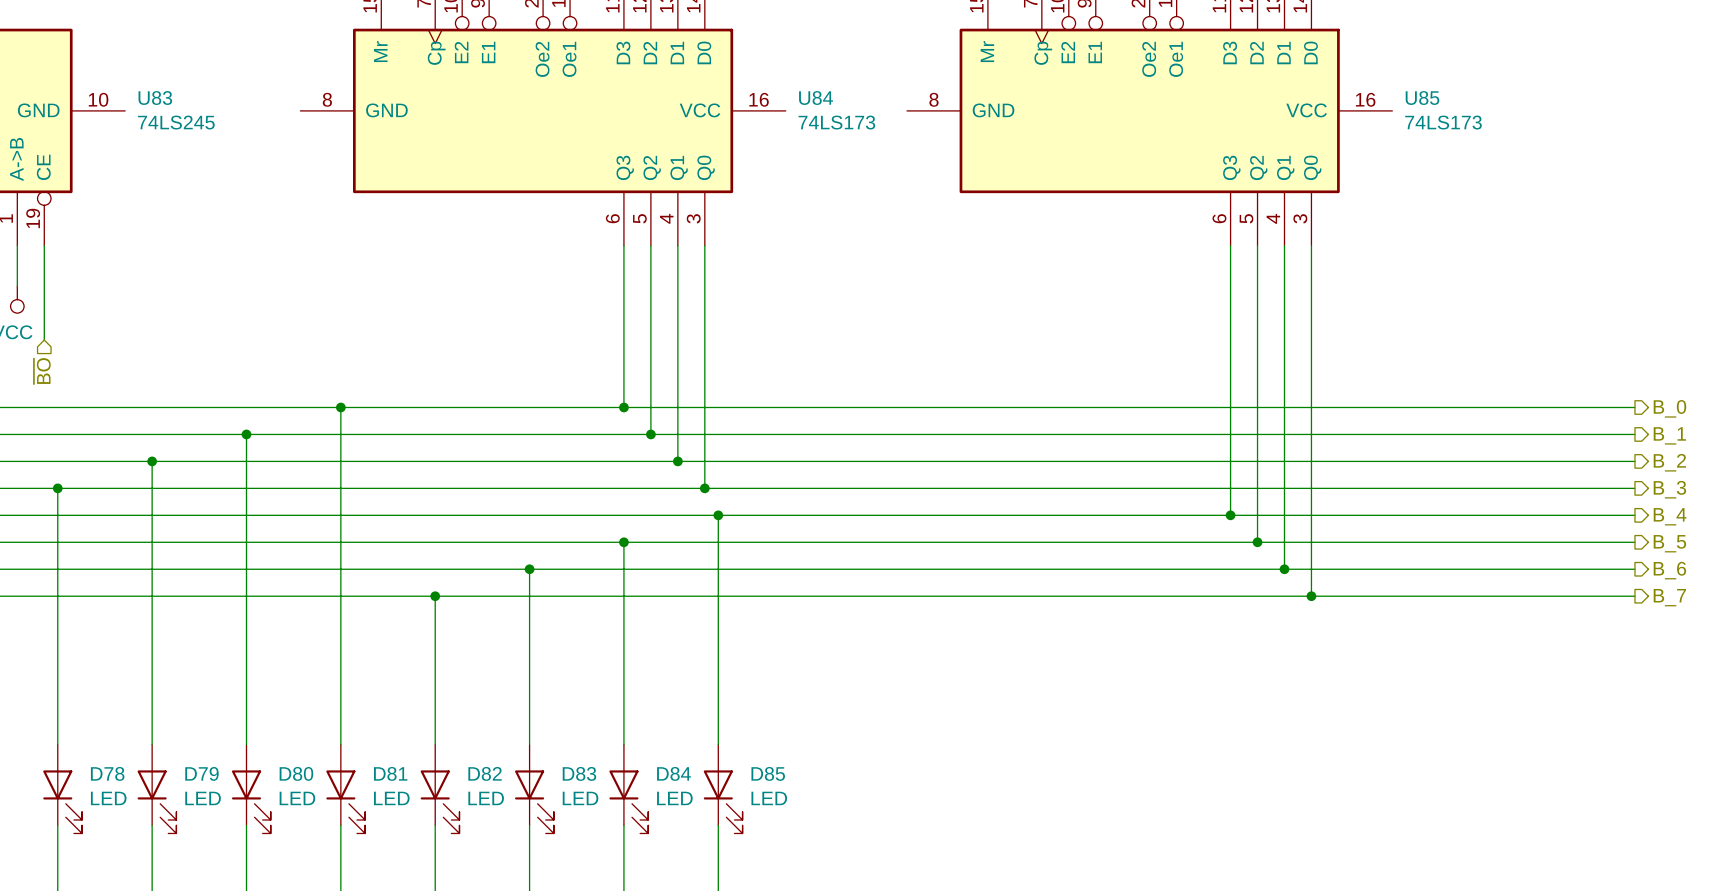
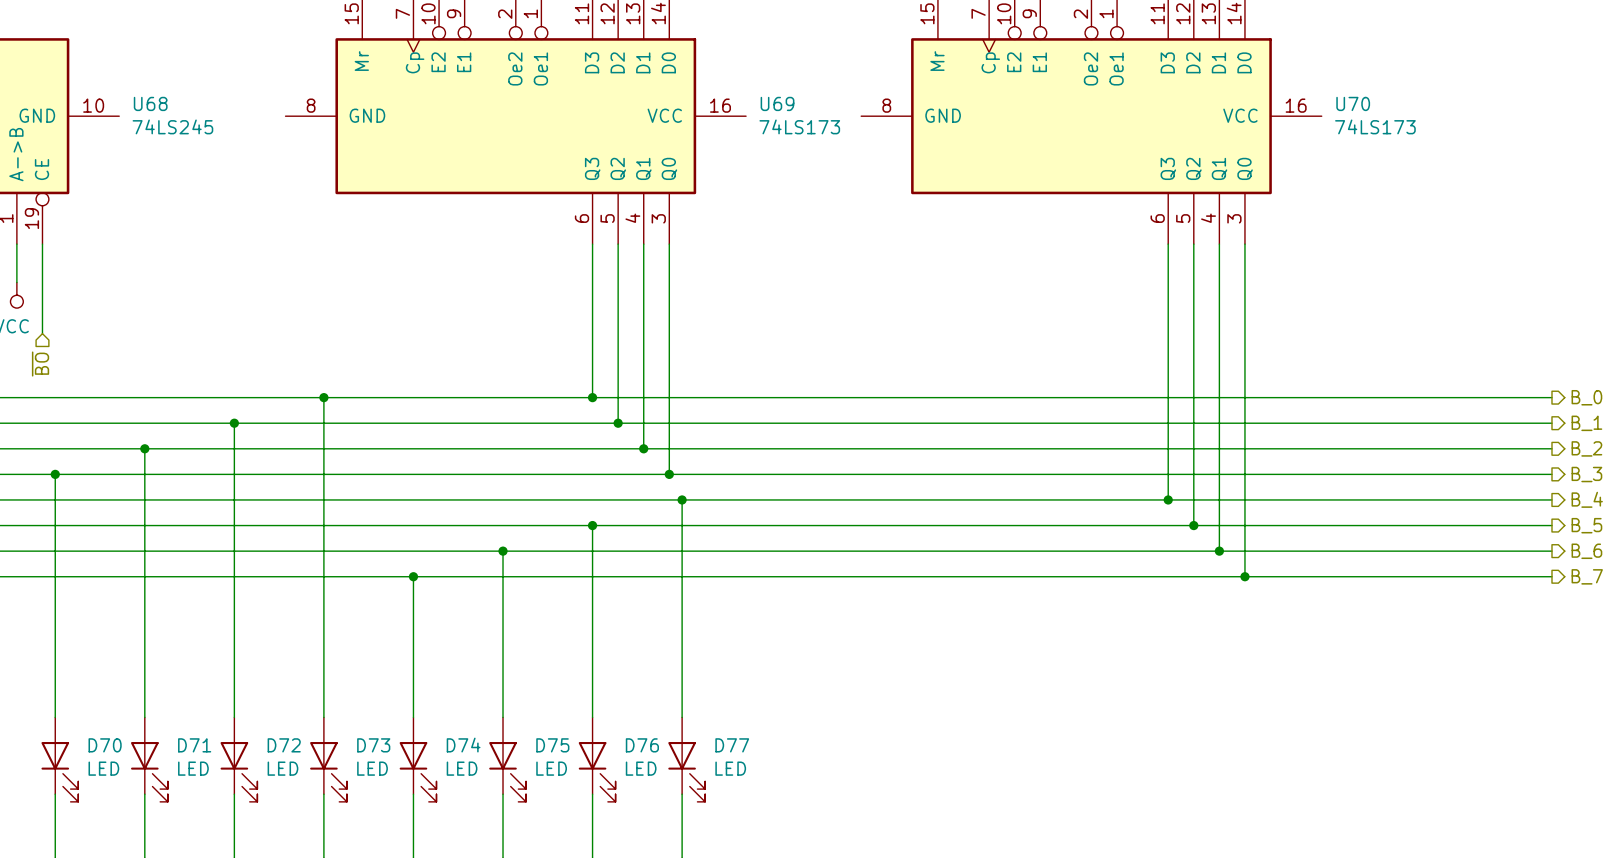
U83 name: U83 (155, 98) -> U68 (150, 103)
U84 name: U84 (816, 98) -> U69 (777, 103)
U85 name: U85 (1422, 98) -> U70 (1353, 103)
D78 name: D78 (107, 773) -> D70 (105, 745)
D79 name: D79 (201, 773) -> D71 (194, 745)
D80 name: D80 (296, 773) -> D72 (284, 745)
D81 name: D81 (390, 773) -> D73 (373, 745)
D82 name: D82 (485, 773) -> D74 (463, 745)
D83 name: D83 (579, 773) -> D75 (552, 745)
D84 name: D84 (673, 773) -> D76 (642, 745)
D85 name: D85 (768, 773) -> D77 (732, 745)

